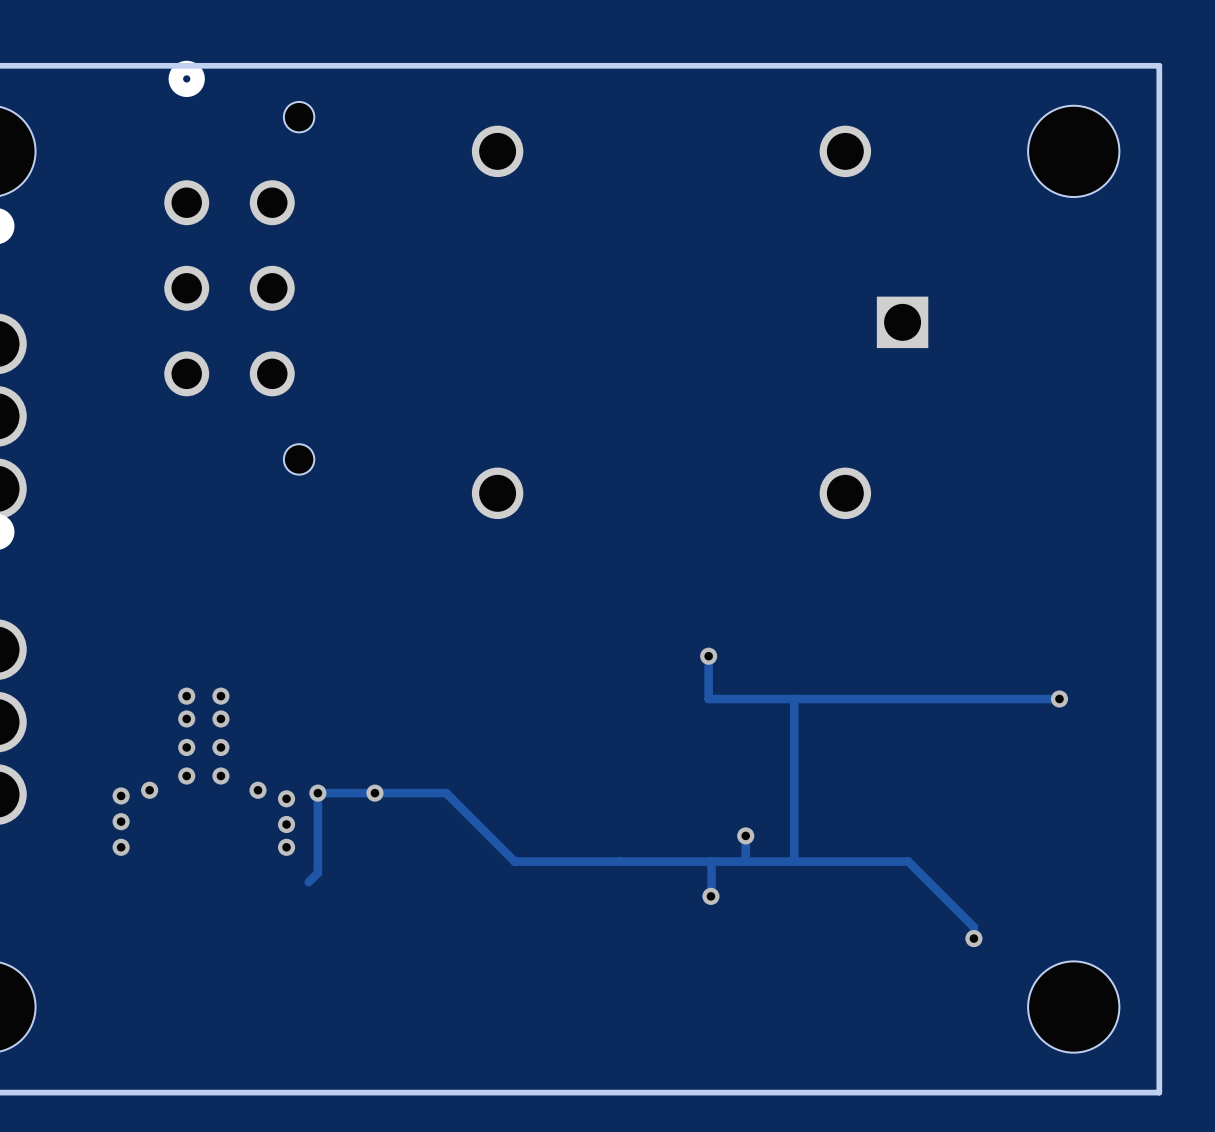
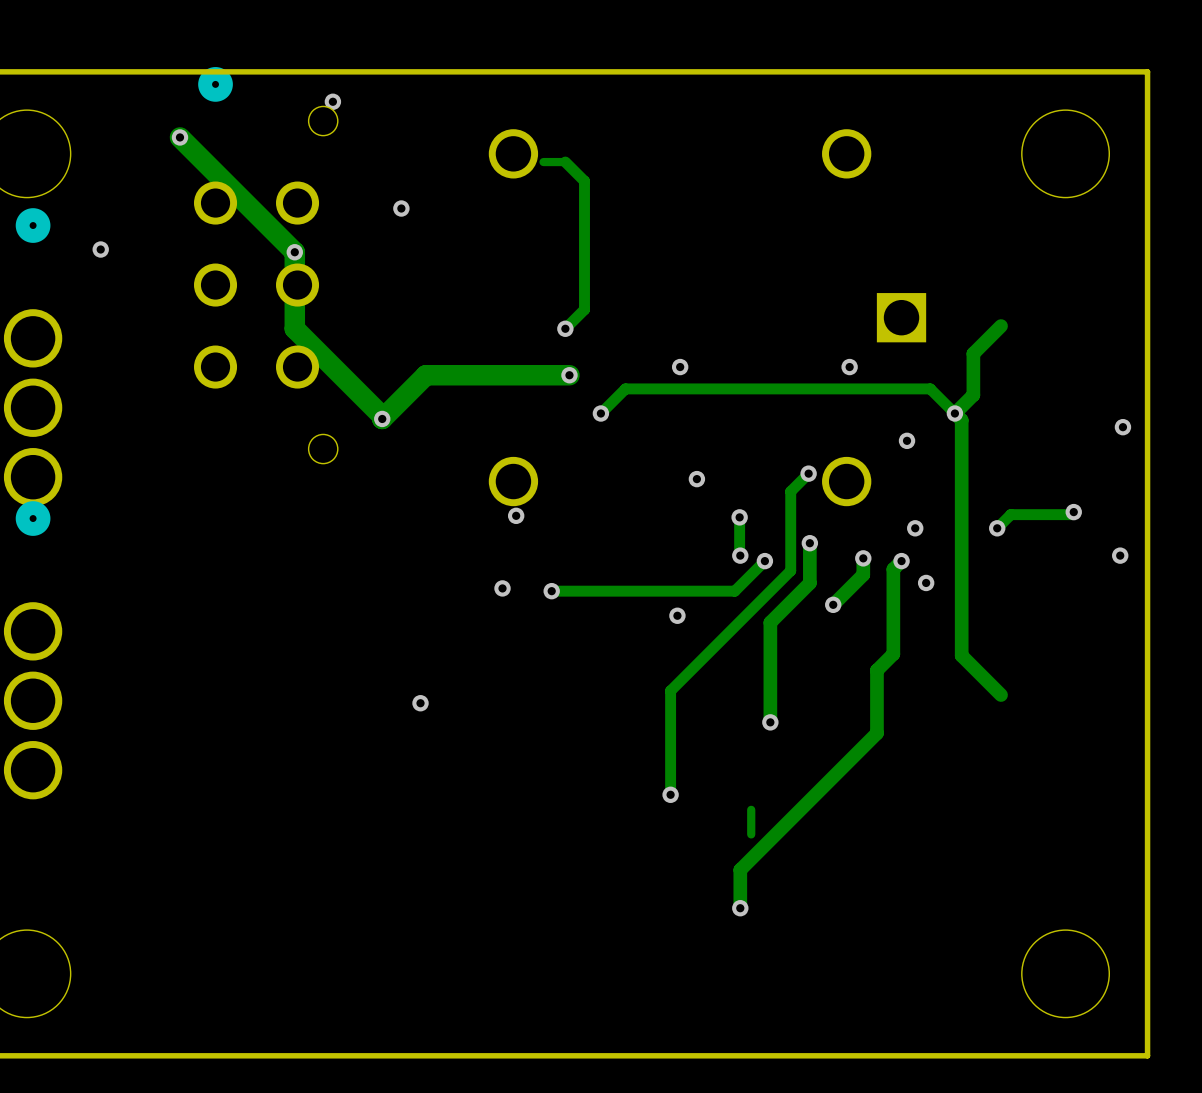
via: none -> (332, 101)
track: none -> (179, 137) (294, 252) (294, 328) (382, 416) (382, 418) (425, 375) (569, 375)
via: none -> (179, 137)
track: none -> (543, 162) (565, 162) (584, 181) (584, 309) (565, 328)
via: none -> (401, 208)
via: none -> (100, 249)
via: none -> (294, 252)
track: none -> (1001, 326) (973, 353) (973, 395) (954, 413)
via: none -> (565, 328)
via: none -> (680, 367)
via: none -> (849, 367)
via: none -> (569, 375)
via: none -> (600, 413)
track: none -> (954, 413) (961, 420) (961, 655) (1001, 695)
track: none -> (954, 413) (930, 388) (625, 388) (600, 413)
via: none -> (954, 413)
via: none -> (382, 418)
via: none -> (1122, 427)
via: none -> (907, 440)
track: none -> (808, 473) (790, 491) (790, 570) (670, 690) (670, 794)
via: none -> (808, 473)
via: none -> (696, 479)
track: none -> (1073, 512) (1071, 514) (1010, 514) (997, 528)
via: none -> (1073, 512)
via: none -> (516, 515)
track: none -> (739, 517) (740, 555)
via: none -> (739, 517)
via: none -> (915, 528)
via: none -> (997, 528)
track: none -> (809, 543) (809, 583) (770, 622) (770, 722)
via: none -> (809, 543)
via: none -> (740, 555)
via: none -> (1120, 555)
track: none -> (863, 558) (863, 574) (833, 604)
via: none -> (863, 558)
track: none -> (764, 561) (734, 591) (551, 591)
via: none -> (764, 561)
track: none -> (901, 561) (893, 569) (893, 654) (876, 670) (876, 733) (740, 869) (740, 908)
via: none -> (901, 561)
via: none -> (926, 582)
via: none -> (502, 588)
via: none -> (551, 591)
via: none -> (833, 604)
via: none -> (677, 615)
track: (708, 656) (708, 698) (1059, 698) -> none
via: (708, 656) -> none
via: (186, 696) -> none
via: (220, 696) -> none
track: (794, 698) (794, 858) (791, 861) -> none
via: (1059, 698) -> none
via: (186, 718) -> none
via: (220, 718) -> none
via: none -> (420, 703)
via: none -> (770, 722)
via: (186, 747) -> none
via: (220, 747) -> none
via: (186, 776) -> none
via: (220, 776) -> none
via: (149, 790) -> none
via: (258, 790) -> none
via: (317, 793) -> none
via: (374, 793) -> none
via: (121, 795) -> none
via: (286, 798) -> none
via: none -> (670, 794)
via: (121, 821) -> none
via: (286, 824) -> none
via: (745, 835) -> none
via: (121, 847) -> none
via: (286, 847) -> none
track: (711, 861) (710, 896) -> none
track: (308, 882) (317, 872) (317, 793) (446, 793) (514, 861) (908, 861) (973, 927) (973, 938) -> none
via: (710, 896) -> none
via: none -> (740, 908)
via: (973, 938) -> none

